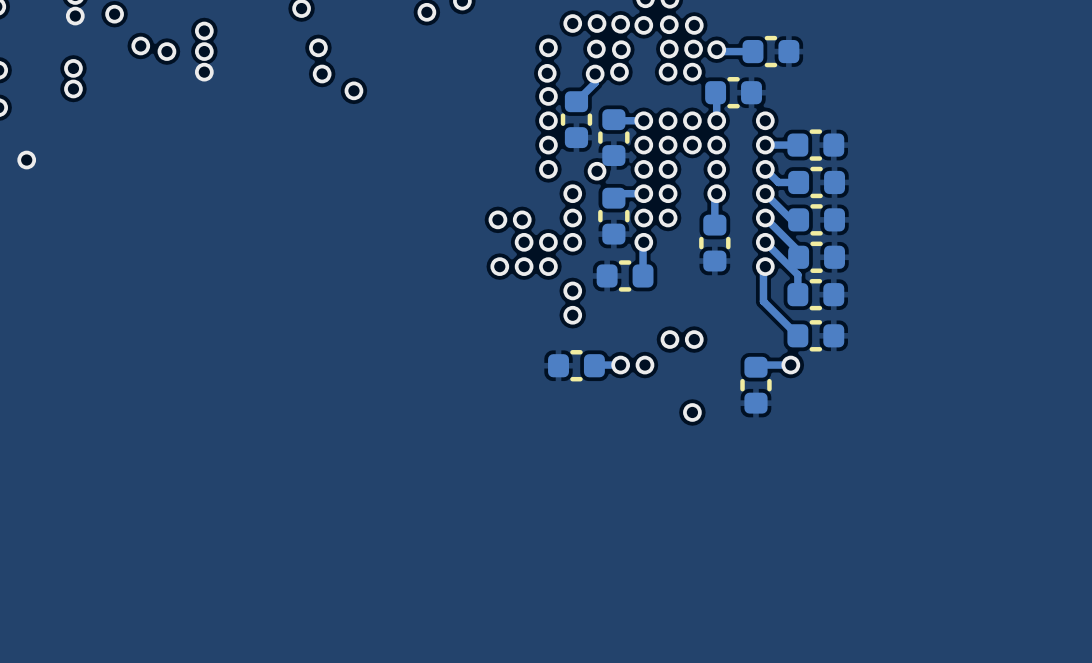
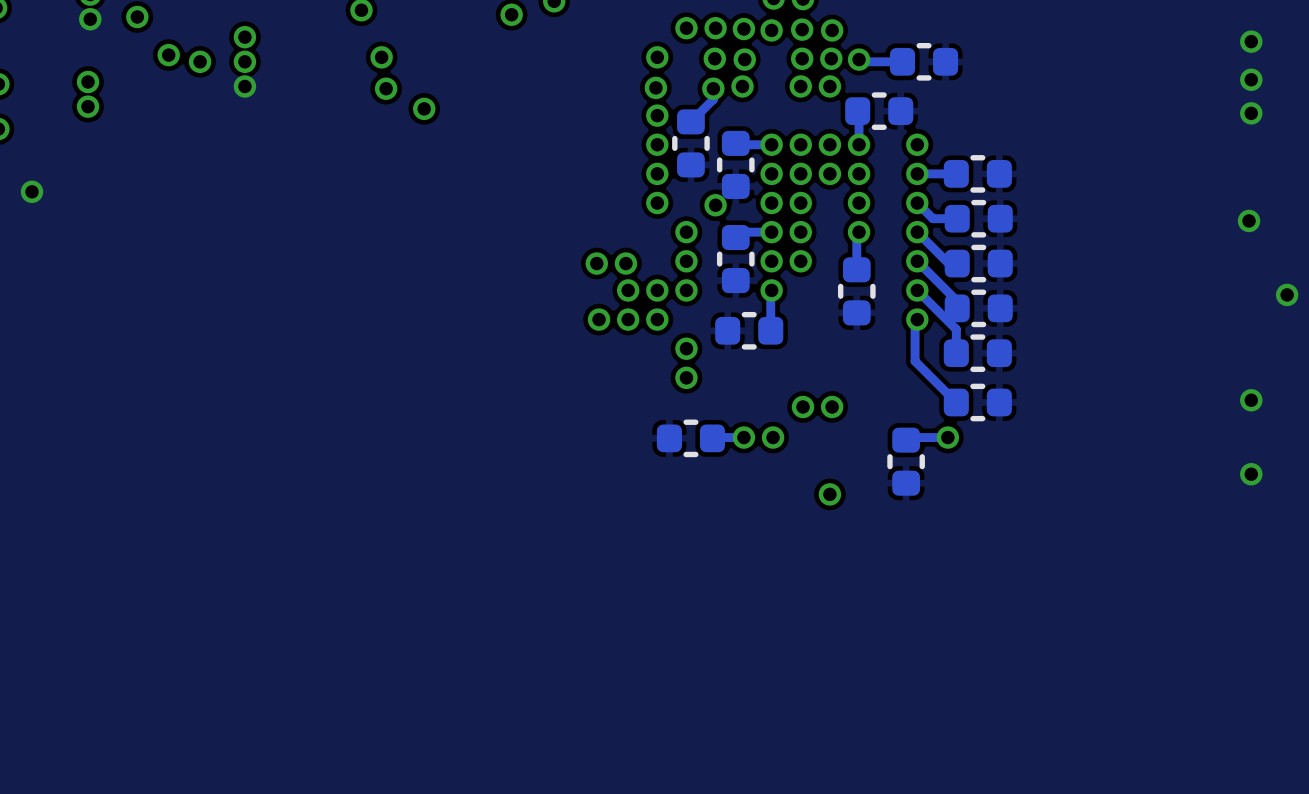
via: none -> (1251, 41)
via: none -> (1251, 79)
via: none -> (1251, 113)
via: none -> (1249, 220)
via: none -> (1287, 294)
via: none -> (1251, 400)
via: none -> (1251, 474)

